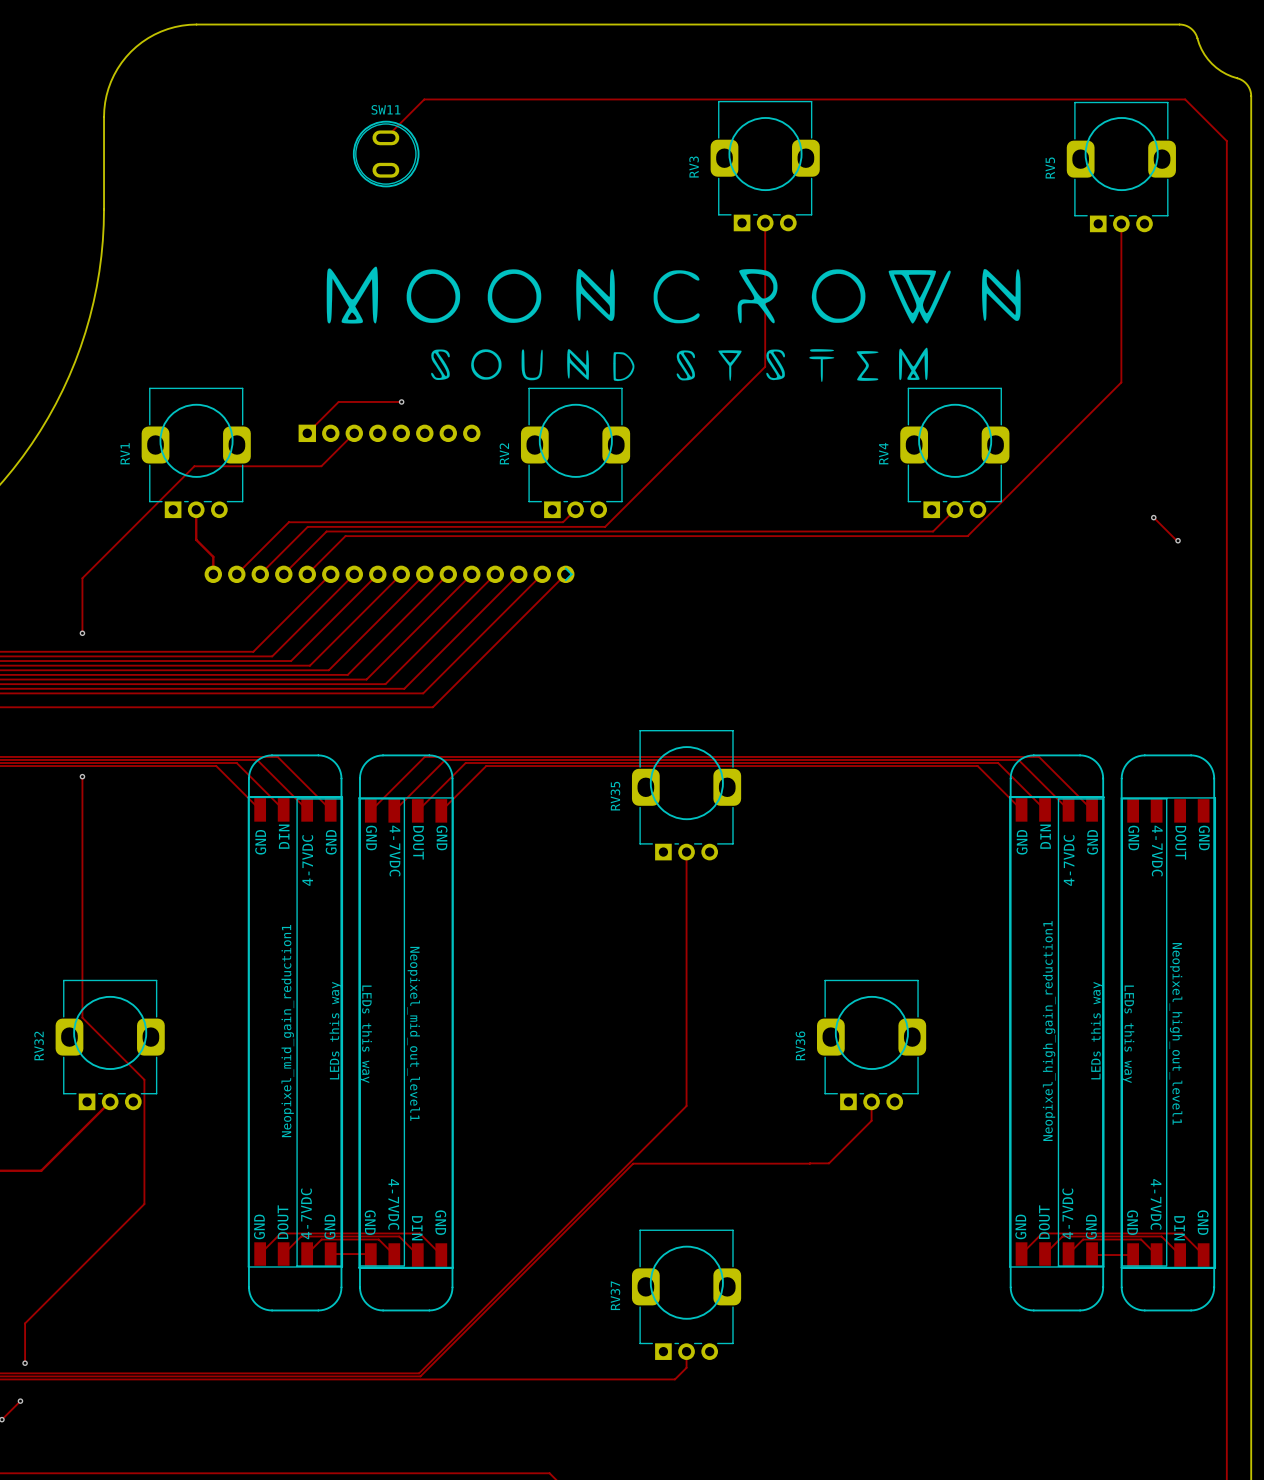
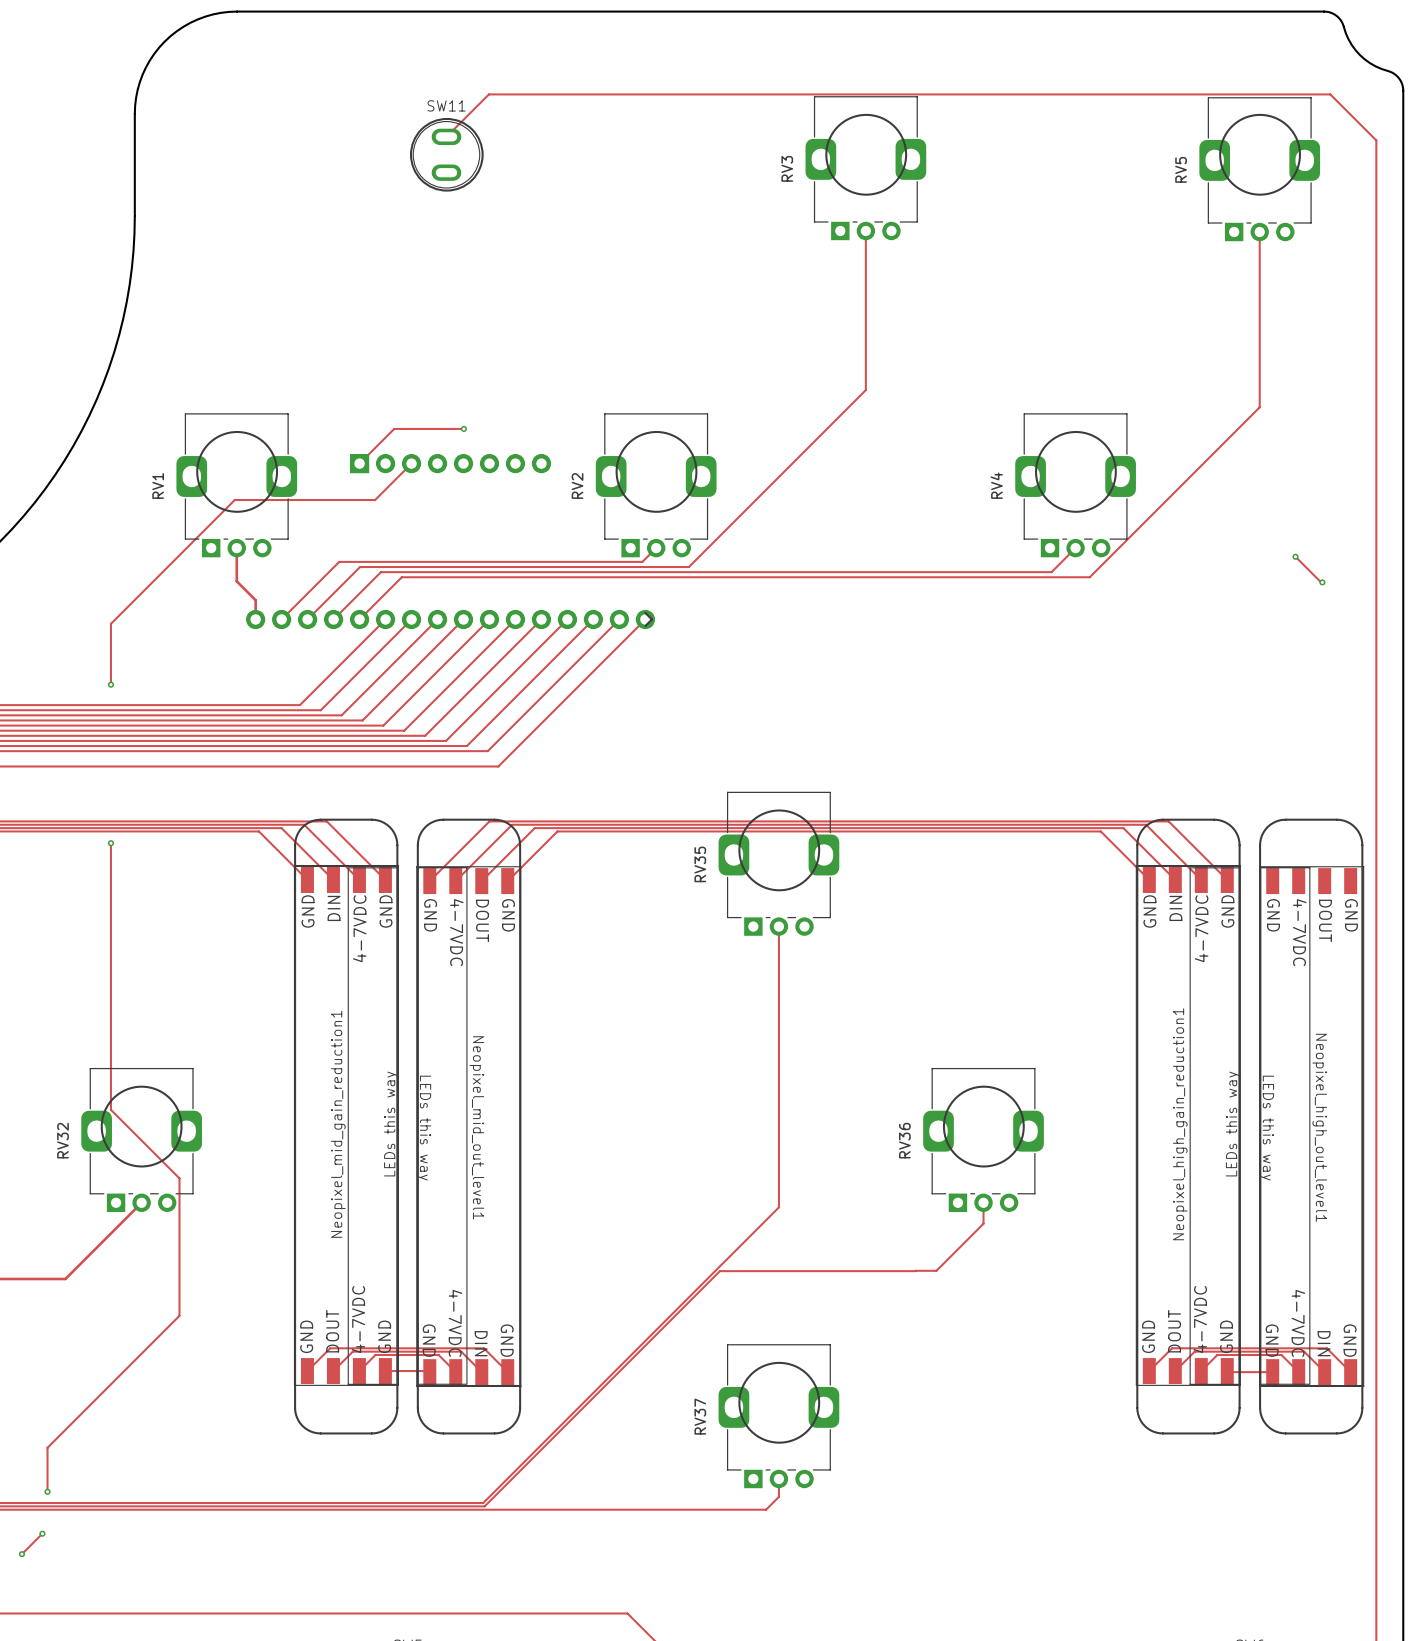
drawing: [326, 266, 1021, 382] -> none

